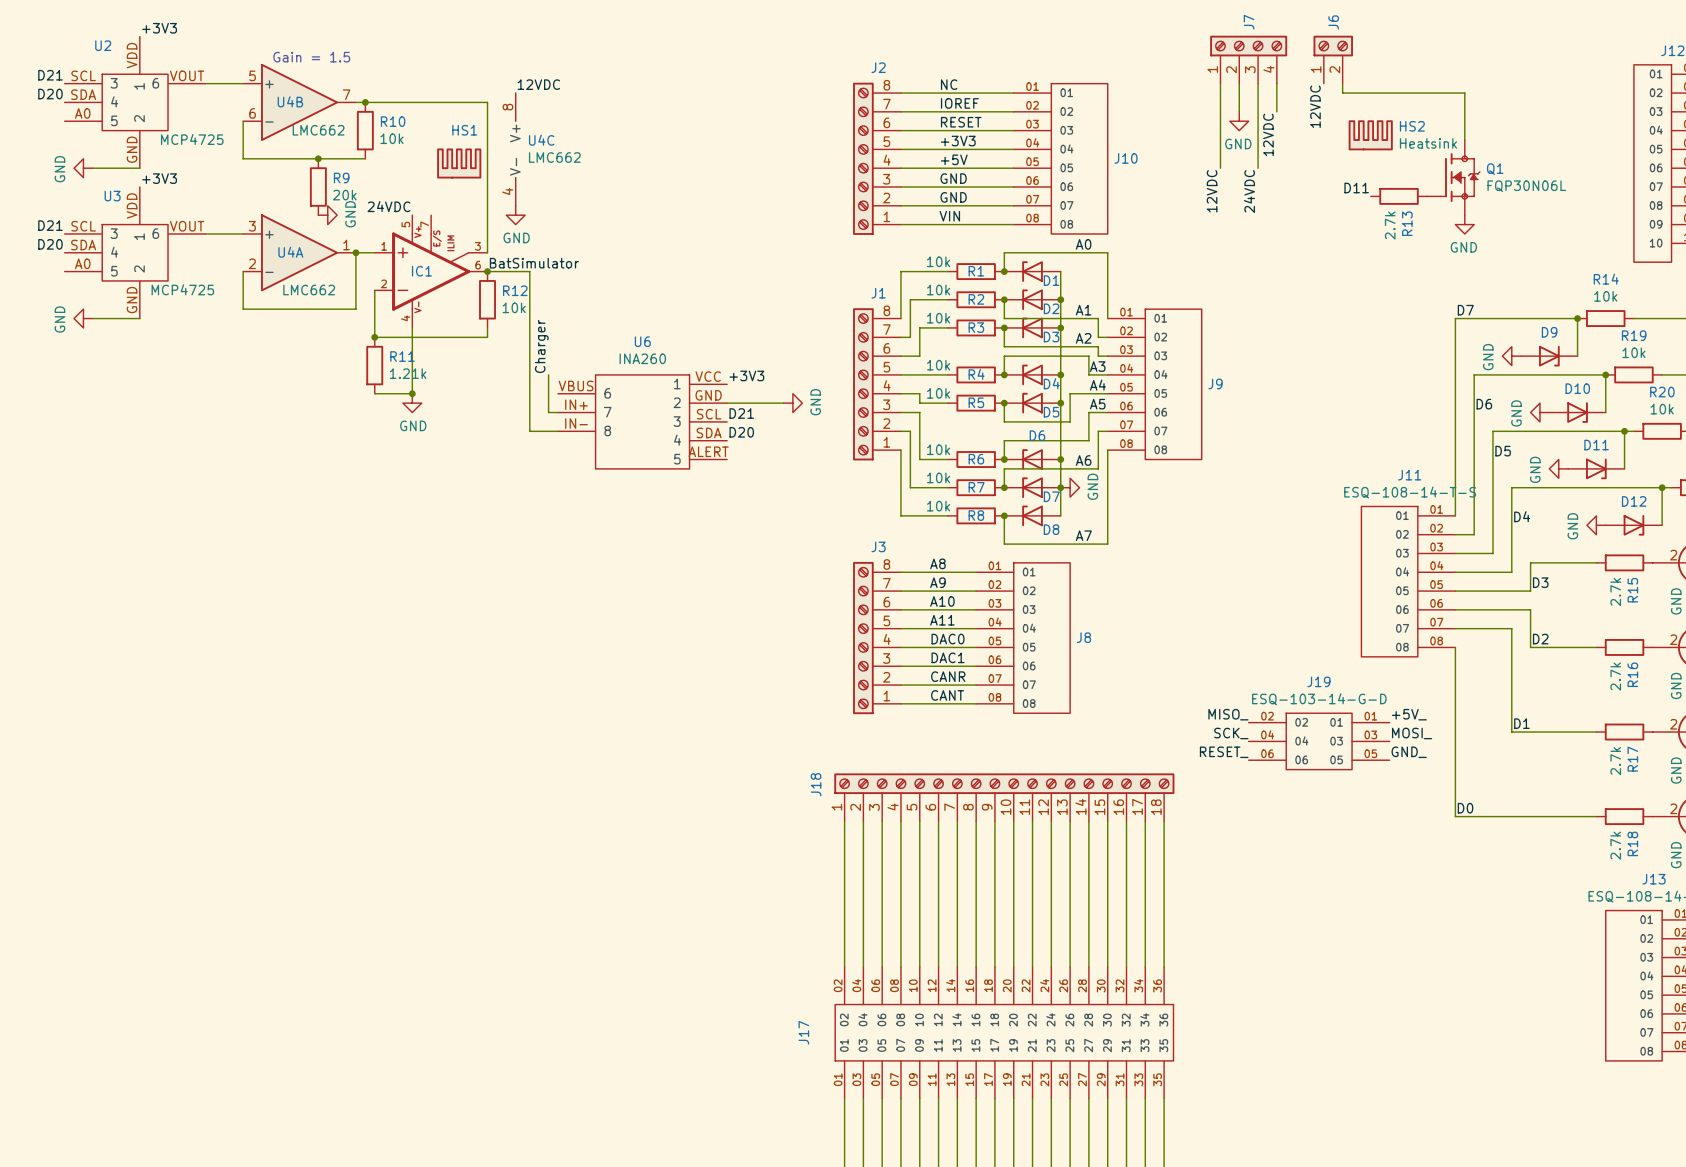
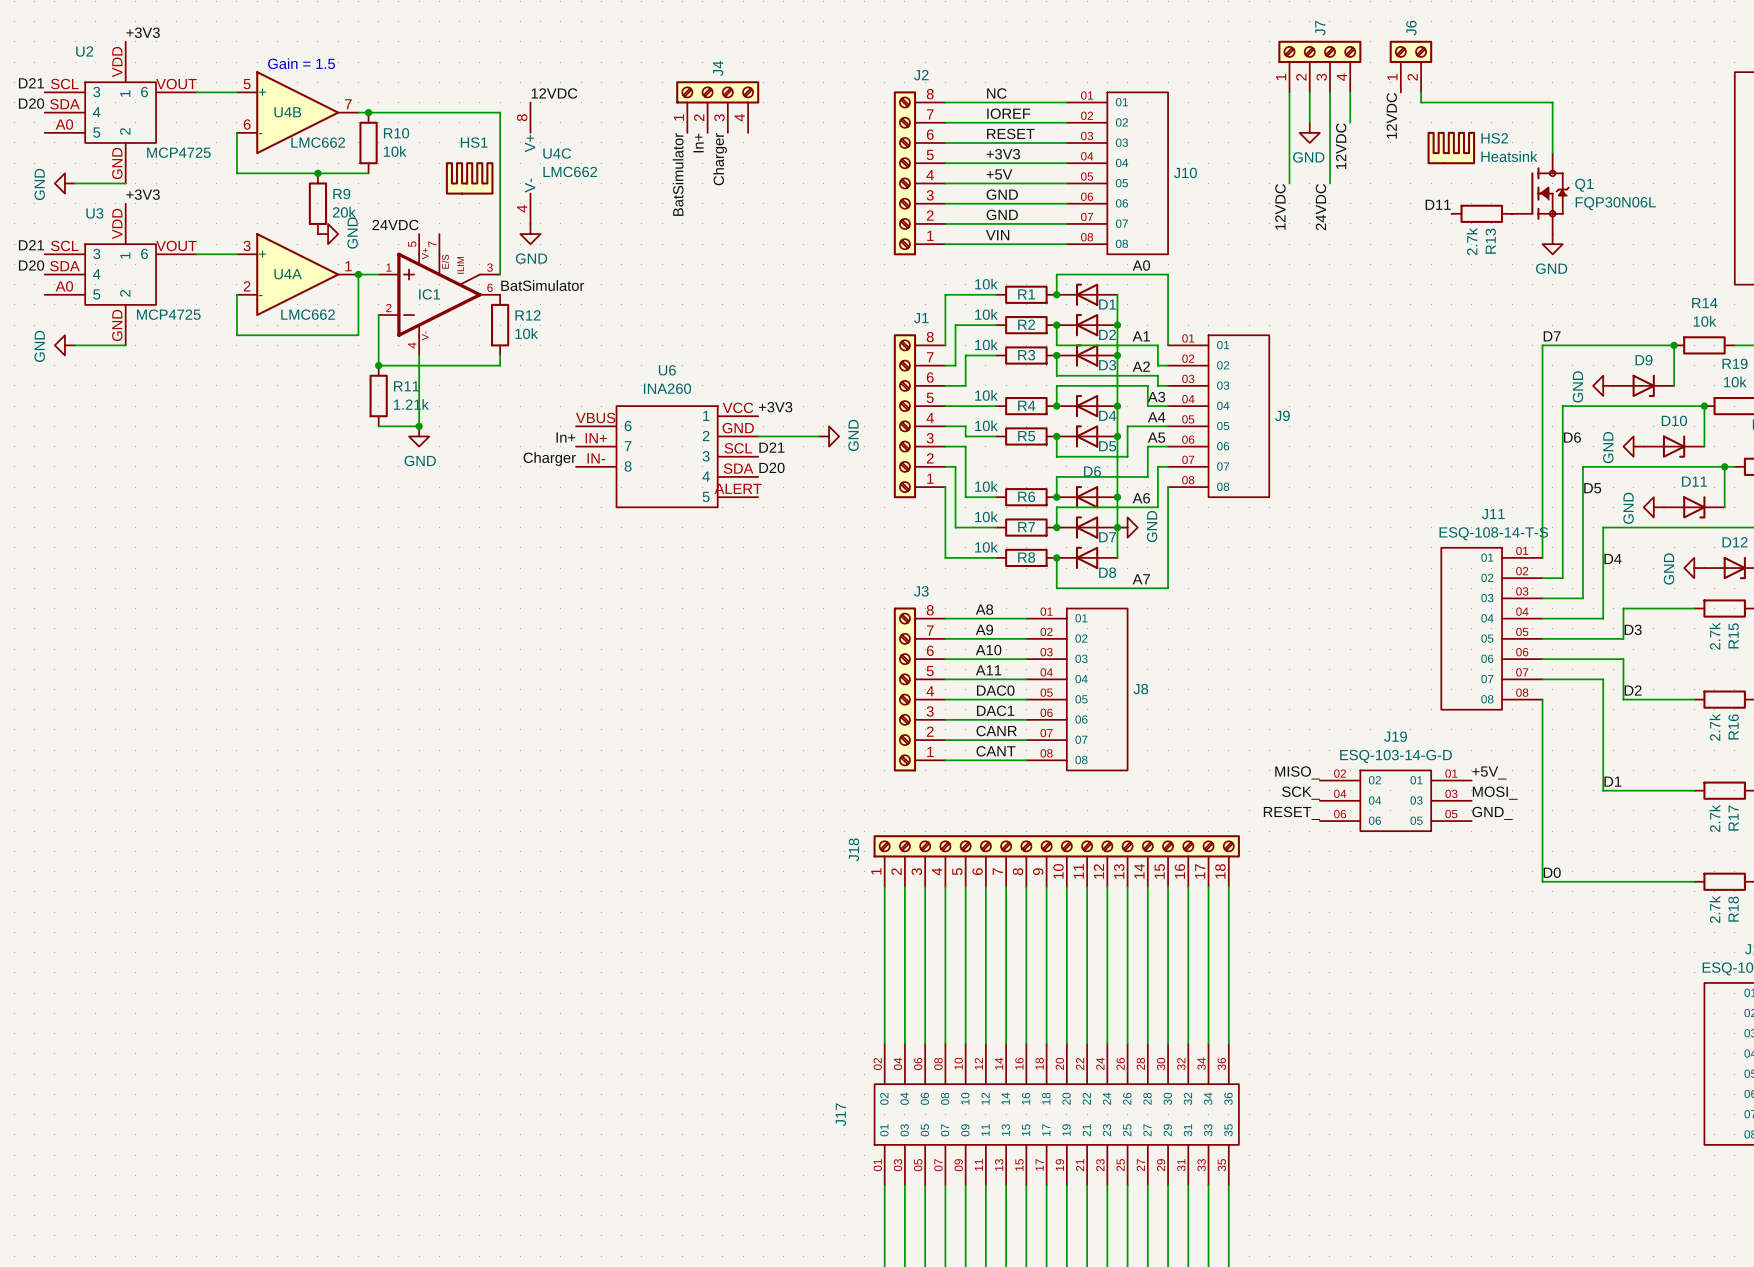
J4: none -> (717, 107)
label: none -> In+ (698, 142)
label: none -> Charger (720, 159)
label: none -> BatSimulator (678, 174)
wire: (487, 271) (529, 271) (529, 431) (557, 431) -> none
junction: (487, 271) -> none
label rotation: 0° (541, 346) -> 90° clockwise (549, 459)
label position: Charger (541, 346) -> Charger (549, 459)
wire: (548, 374) (548, 412) (557, 412) -> none
label: none -> In+ (565, 437)

